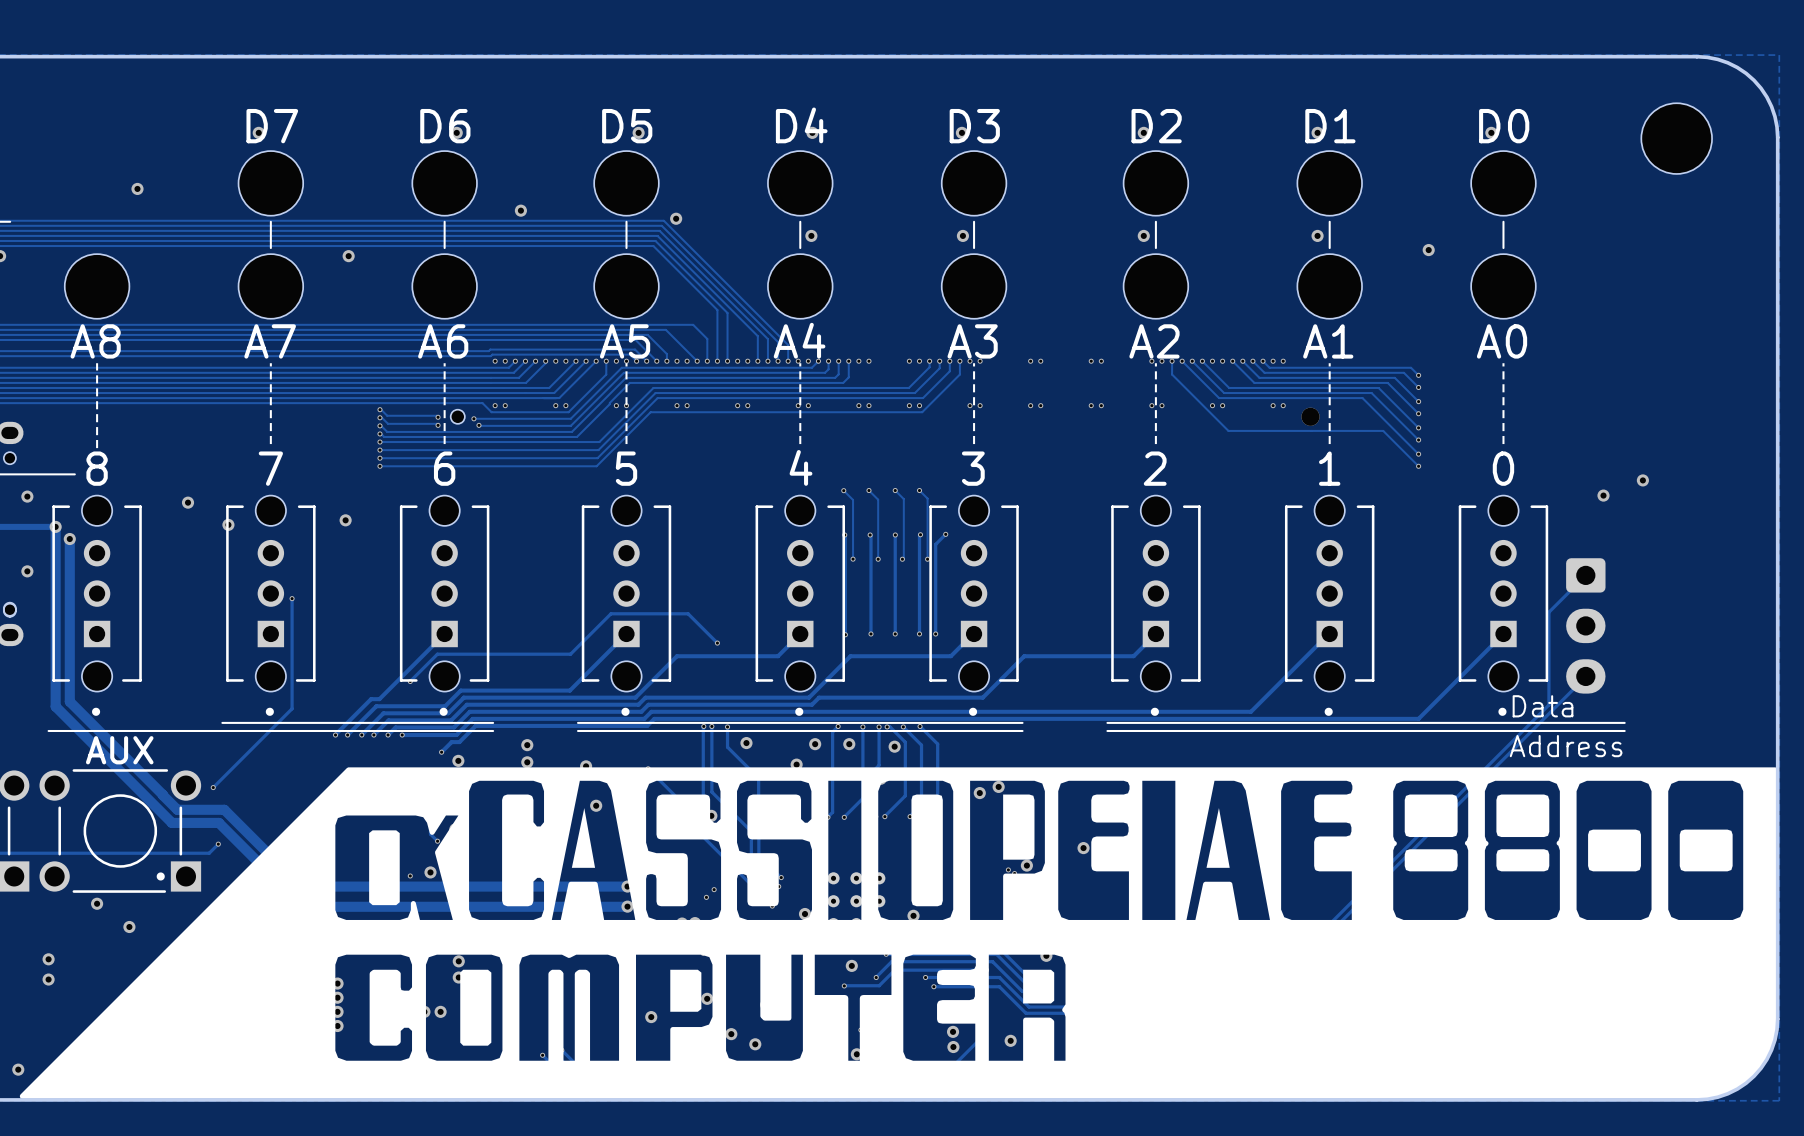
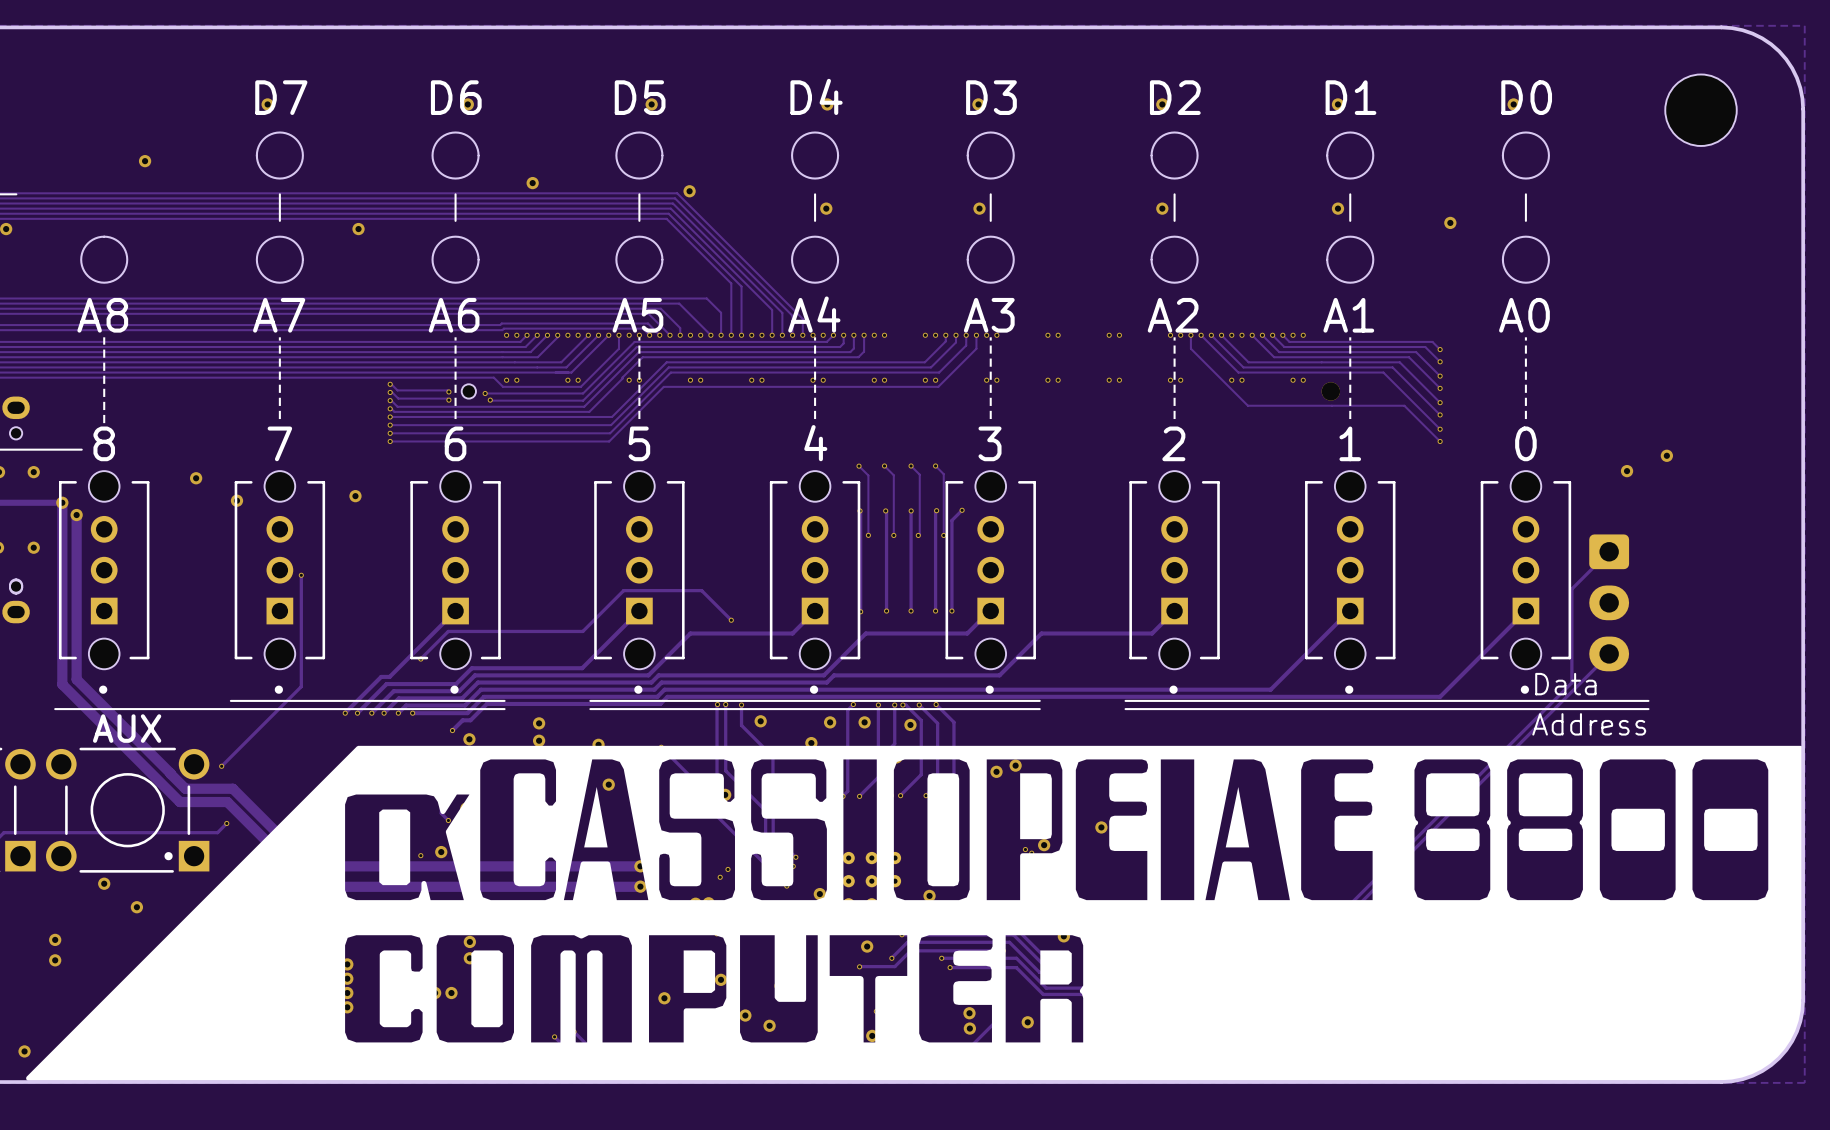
part footprint: [238, 151, 304, 216] -> [255, 131, 304, 180]
part footprint: [412, 151, 477, 216] -> [431, 131, 480, 180]
part footprint: [594, 151, 659, 216] -> [615, 131, 664, 180]
part footprint: [767, 151, 833, 216] -> [791, 131, 840, 180]
part footprint: [941, 151, 1007, 216] -> [966, 131, 1015, 180]
part footprint: [1123, 151, 1189, 216] -> [1150, 131, 1199, 180]
part footprint: [1297, 151, 1363, 216] -> [1326, 131, 1375, 180]
part footprint: [1471, 151, 1536, 216] -> [1501, 131, 1550, 180]
part footprint: [64, 254, 130, 319] -> [80, 235, 129, 284]
part footprint: [238, 254, 304, 319] -> [255, 235, 304, 284]
part footprint: [412, 254, 477, 319] -> [431, 235, 480, 284]
part footprint: [594, 254, 659, 319] -> [615, 235, 664, 284]
part footprint: [767, 254, 833, 319] -> [791, 235, 840, 284]
part footprint: [941, 254, 1007, 319] -> [966, 235, 1015, 284]
part footprint: [1123, 254, 1189, 319] -> [1150, 235, 1199, 284]
part footprint: [1297, 254, 1363, 319] -> [1326, 235, 1375, 284]
part footprint: [1471, 254, 1536, 319] -> [1501, 235, 1550, 284]

